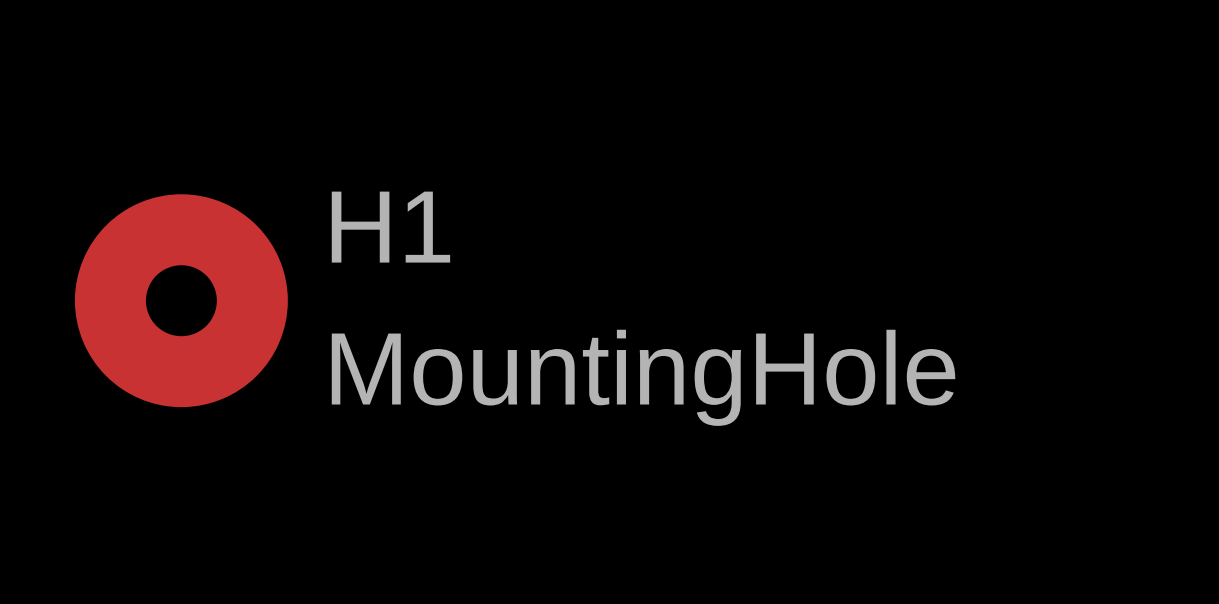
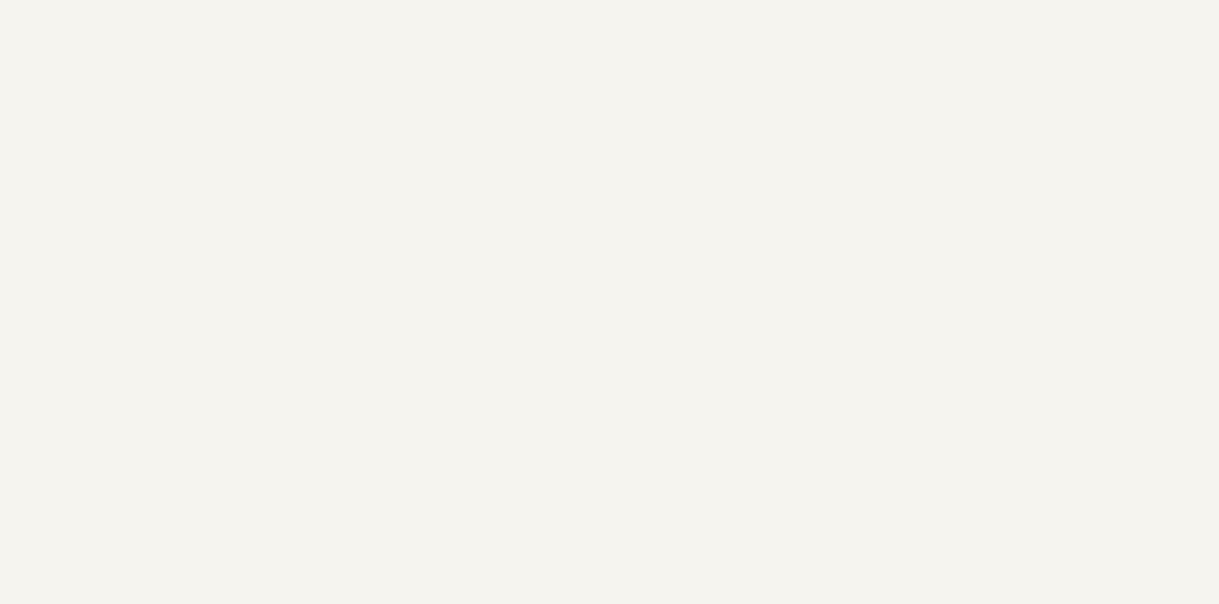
H1: MountingHole (181, 300) -> none

